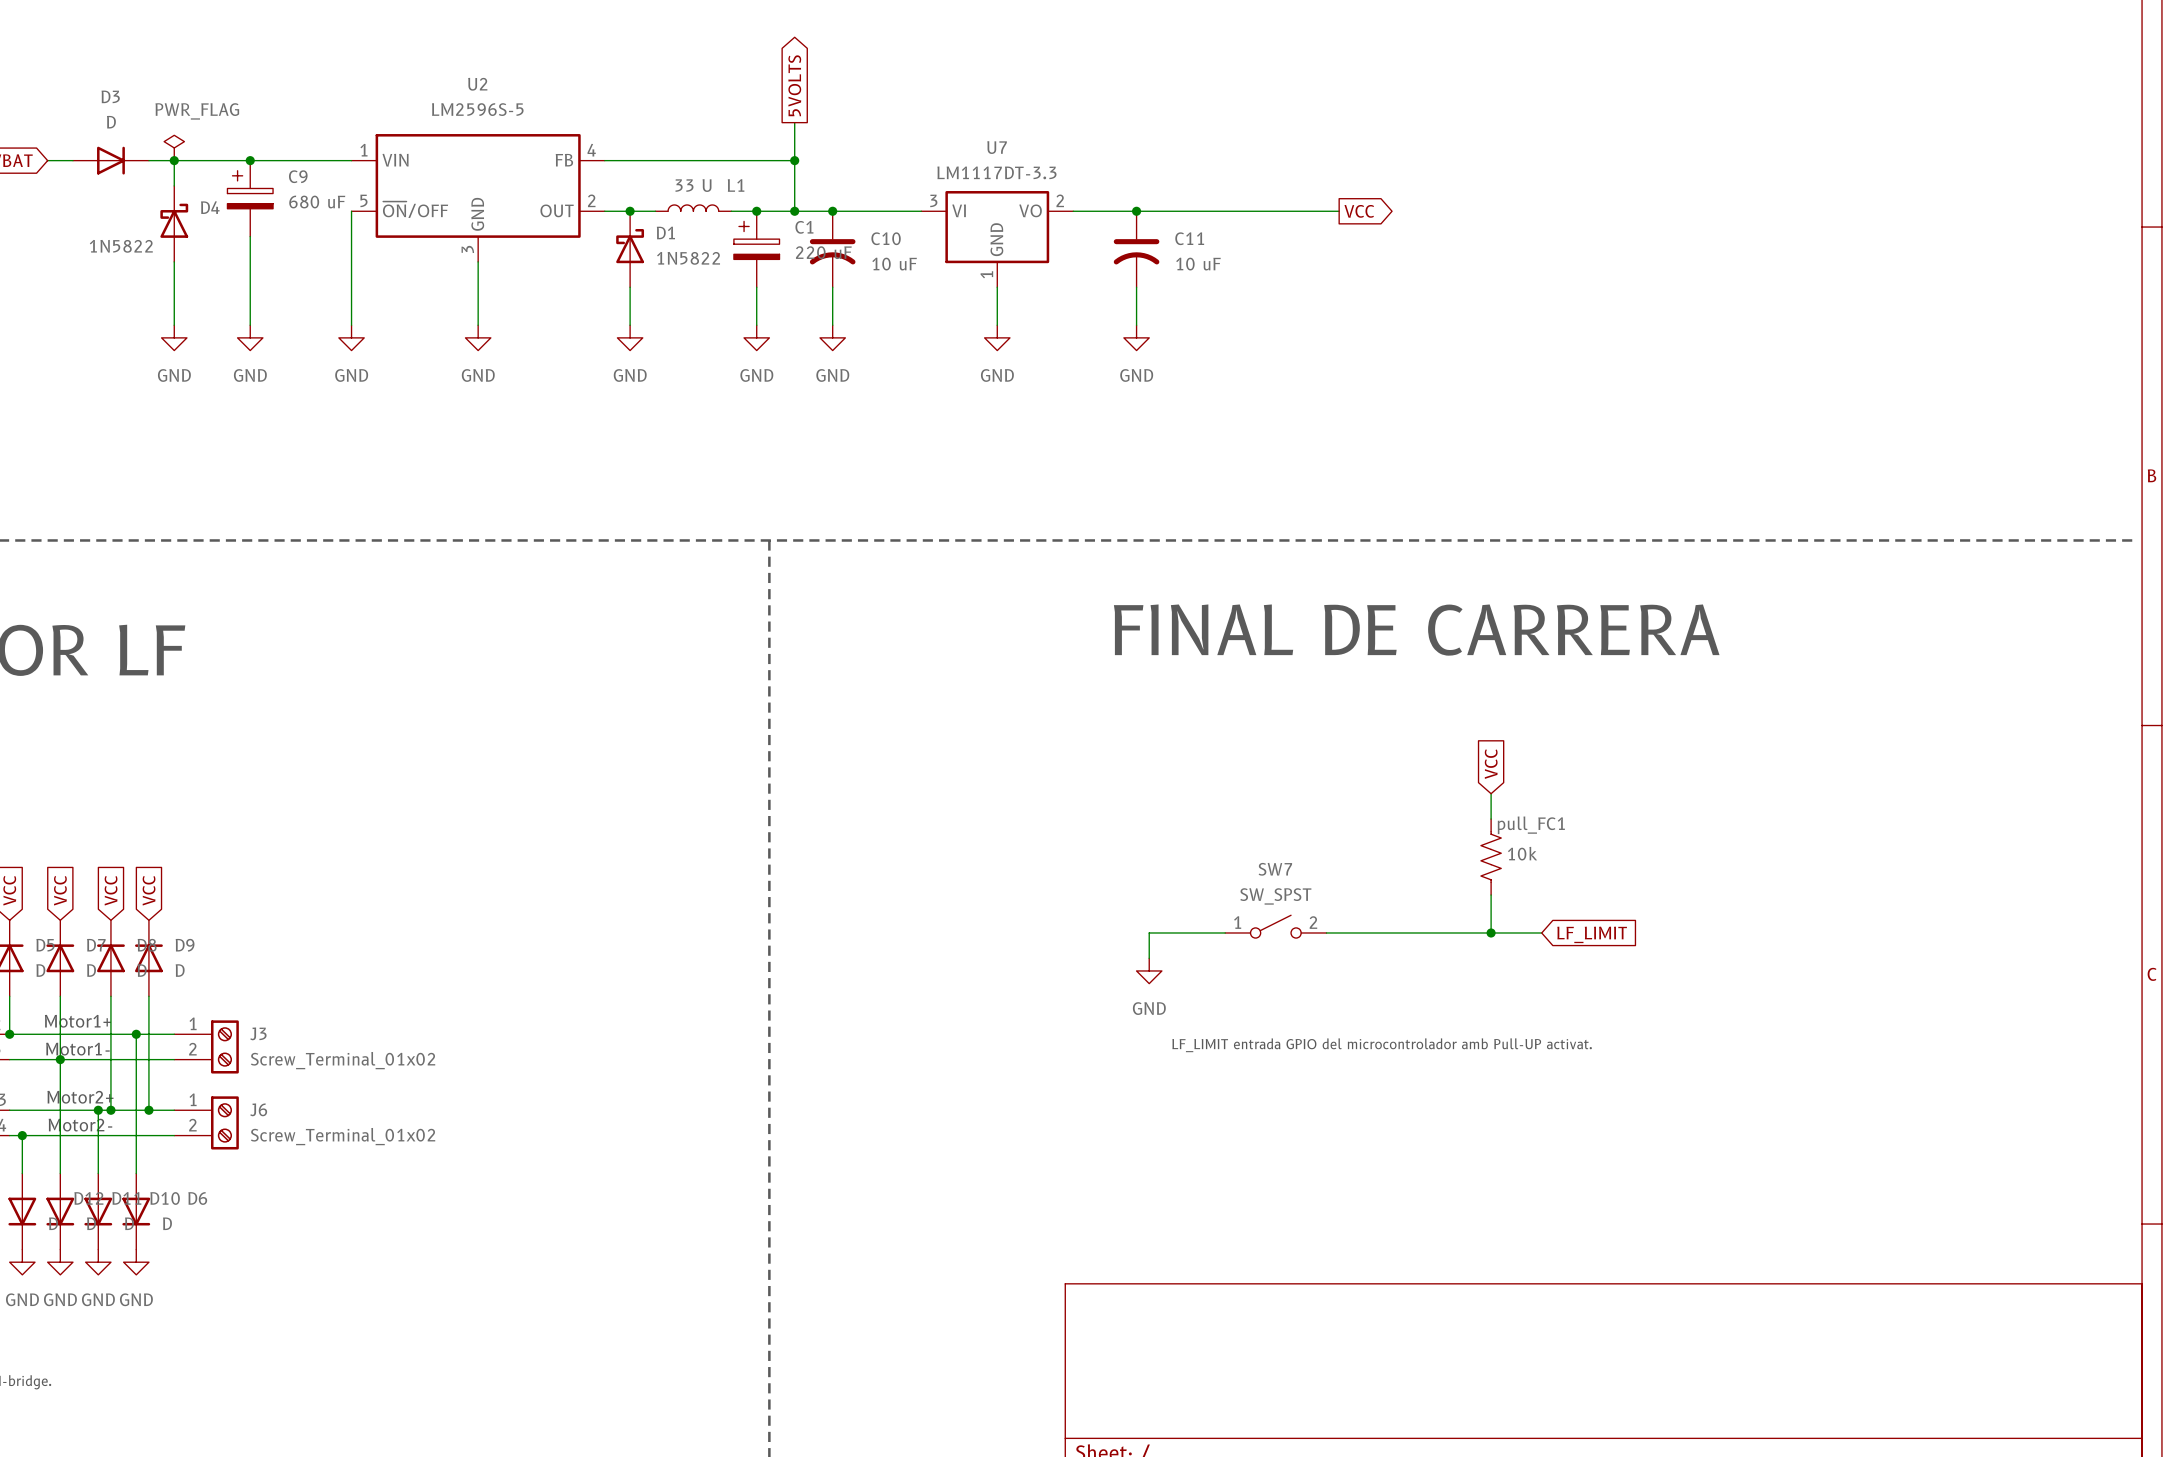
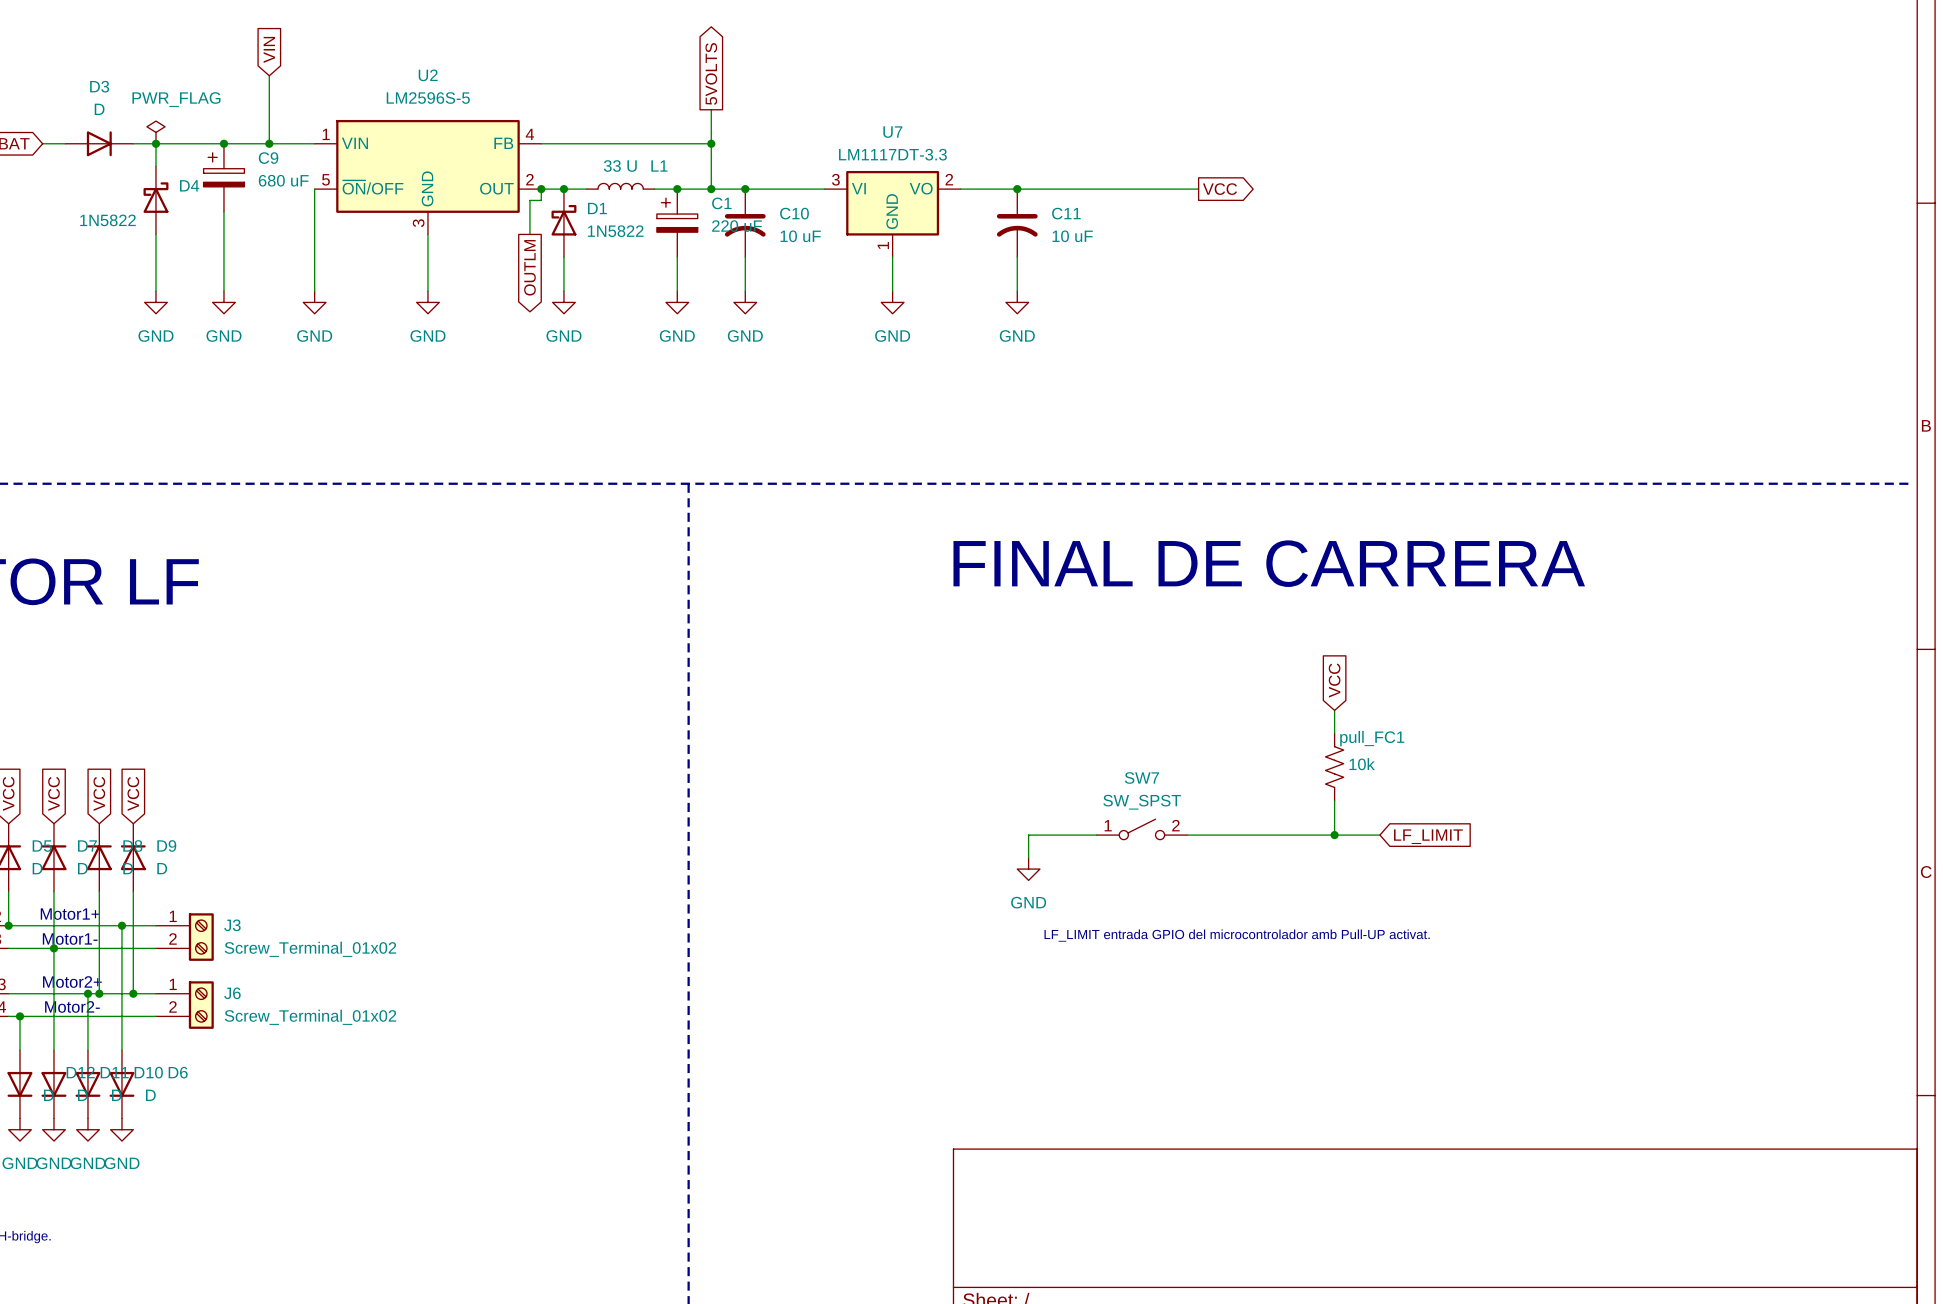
global label: none -> VIN (269, 49)
wire: none -> (269, 75) (269, 143)
junction: none -> (269, 143)
wire: none -> (541, 189) (541, 200) (529, 200) (529, 234)
junction: none -> (541, 189)
global label: none -> OUTLM (529, 267)

